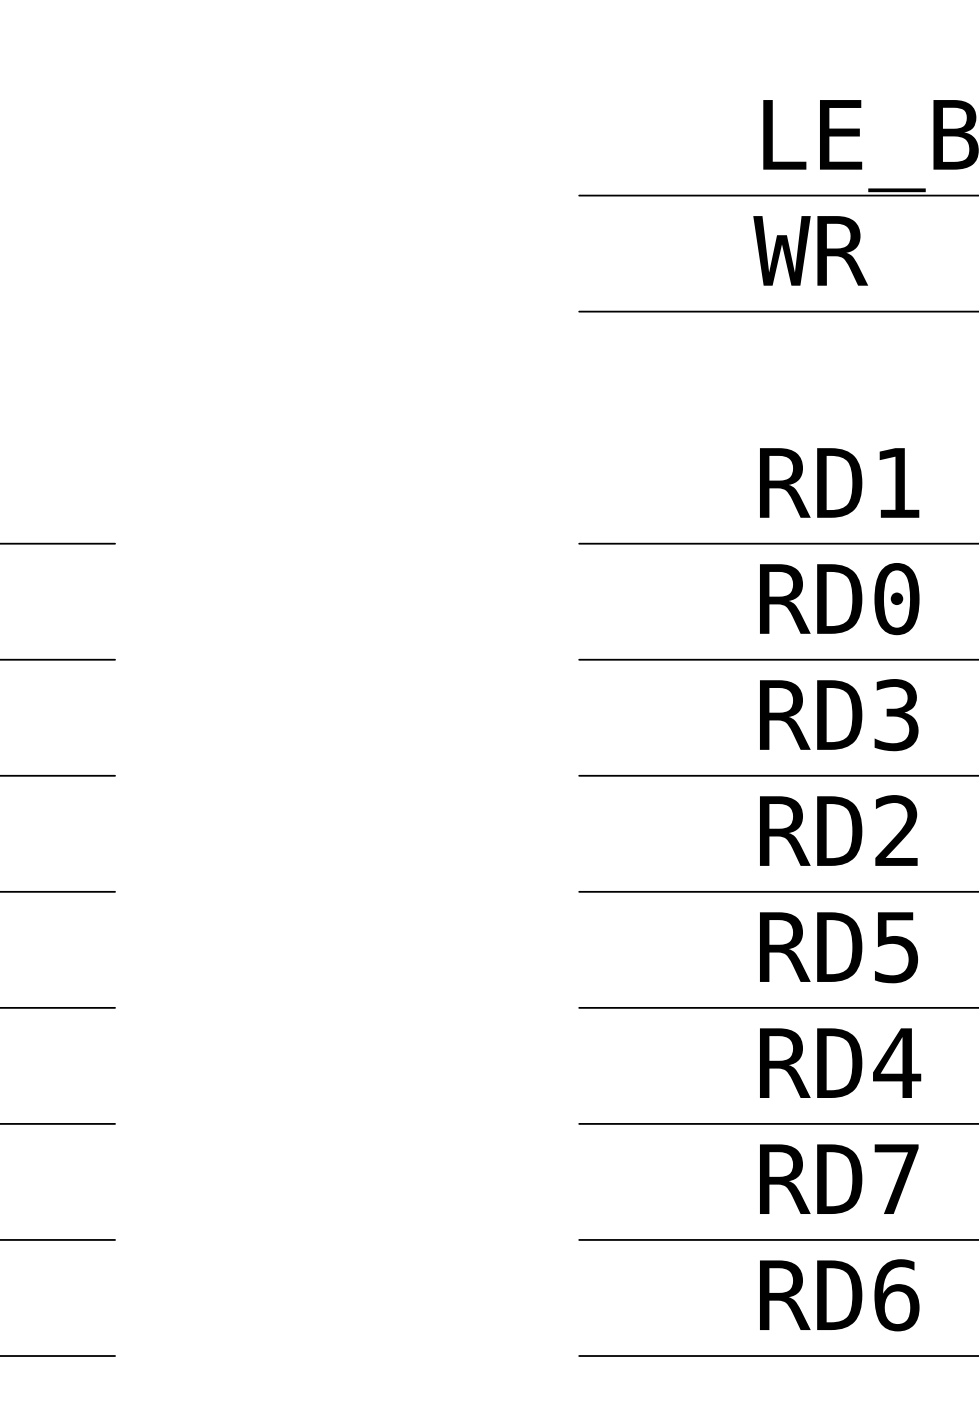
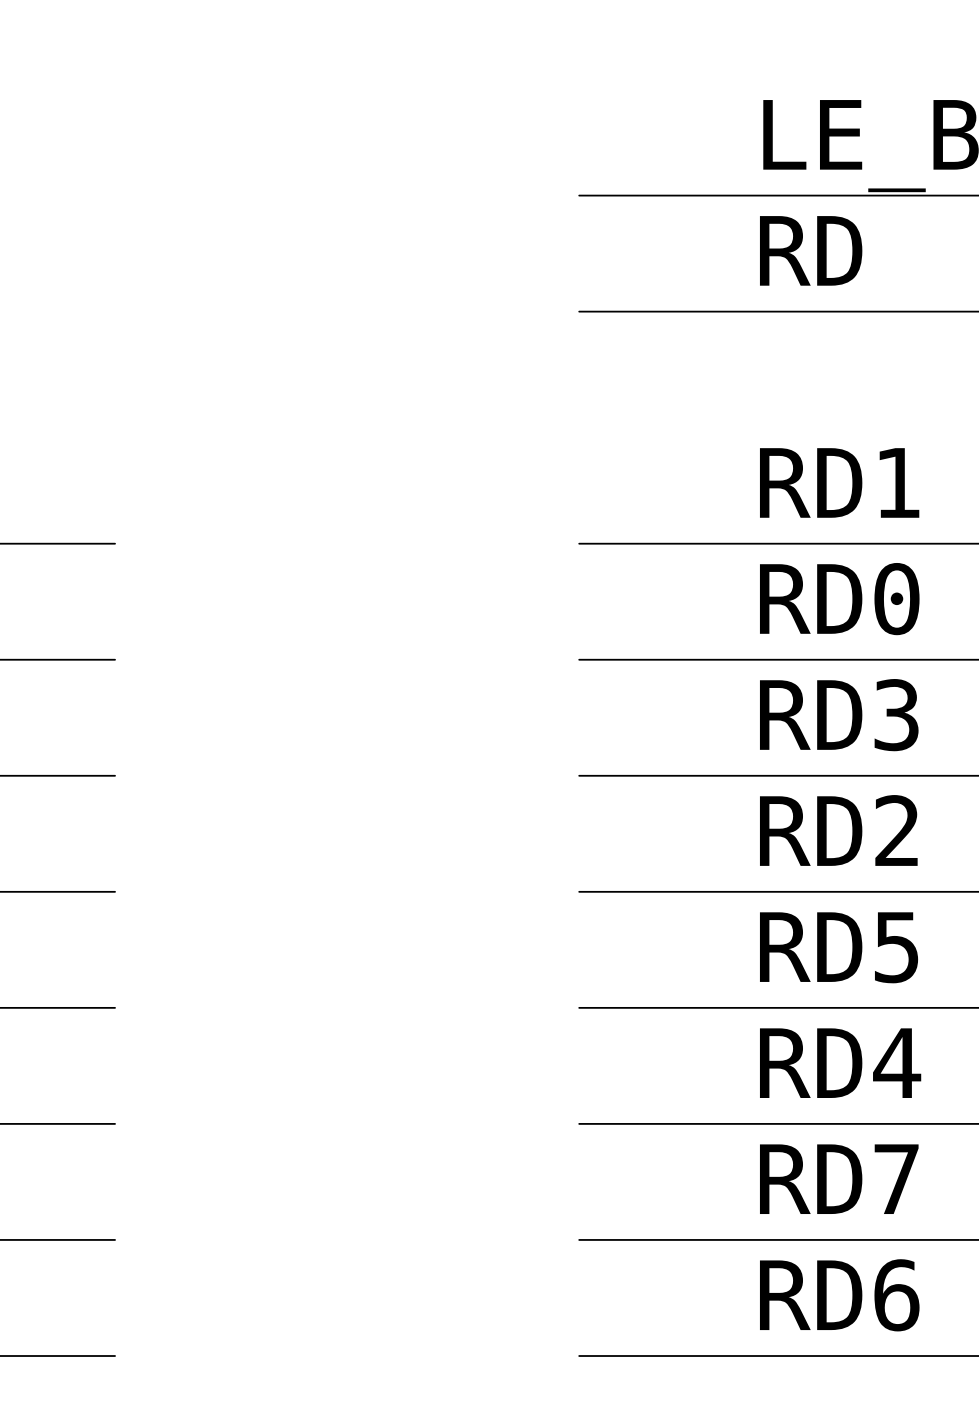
label: WR (810, 250) -> RD (811, 250)

